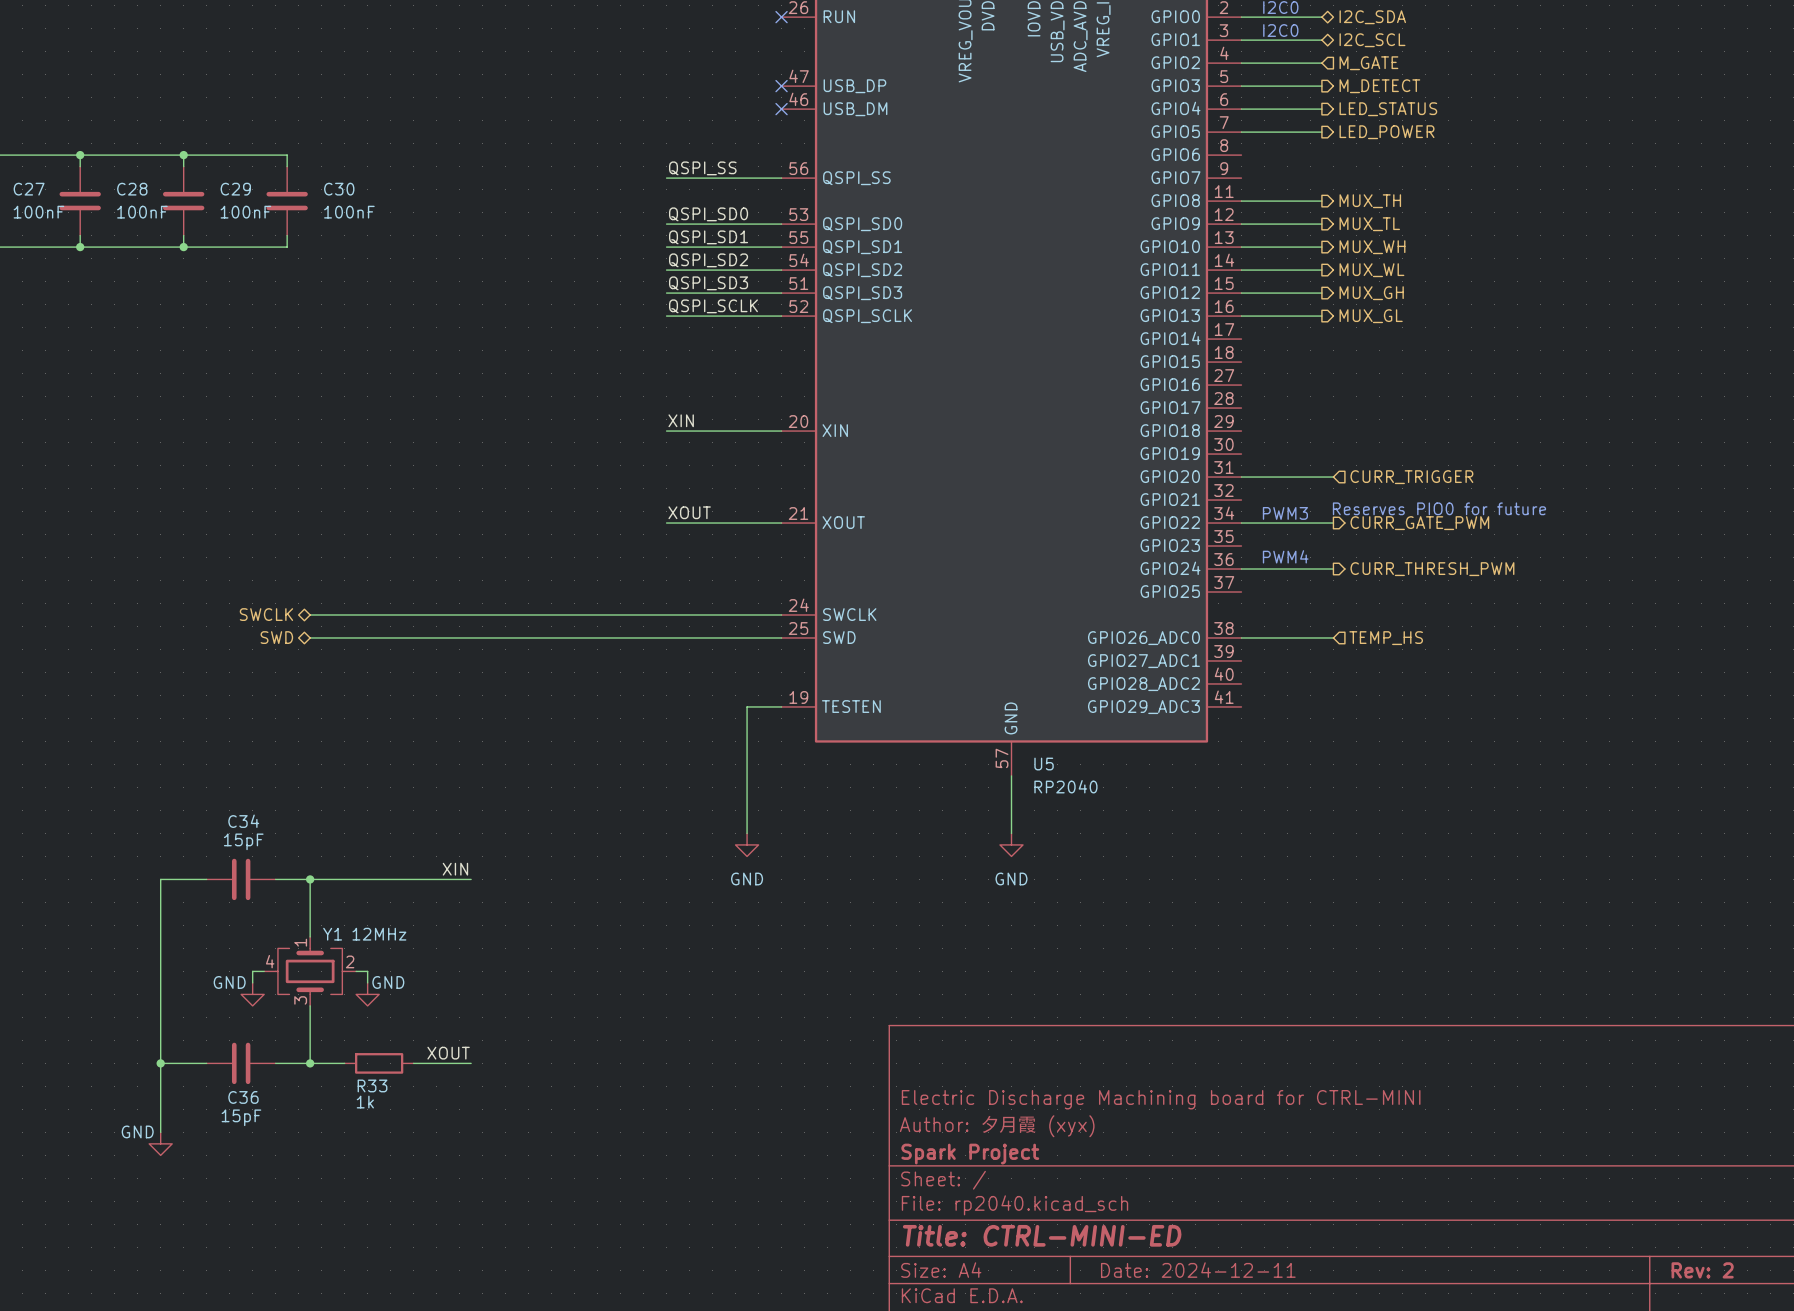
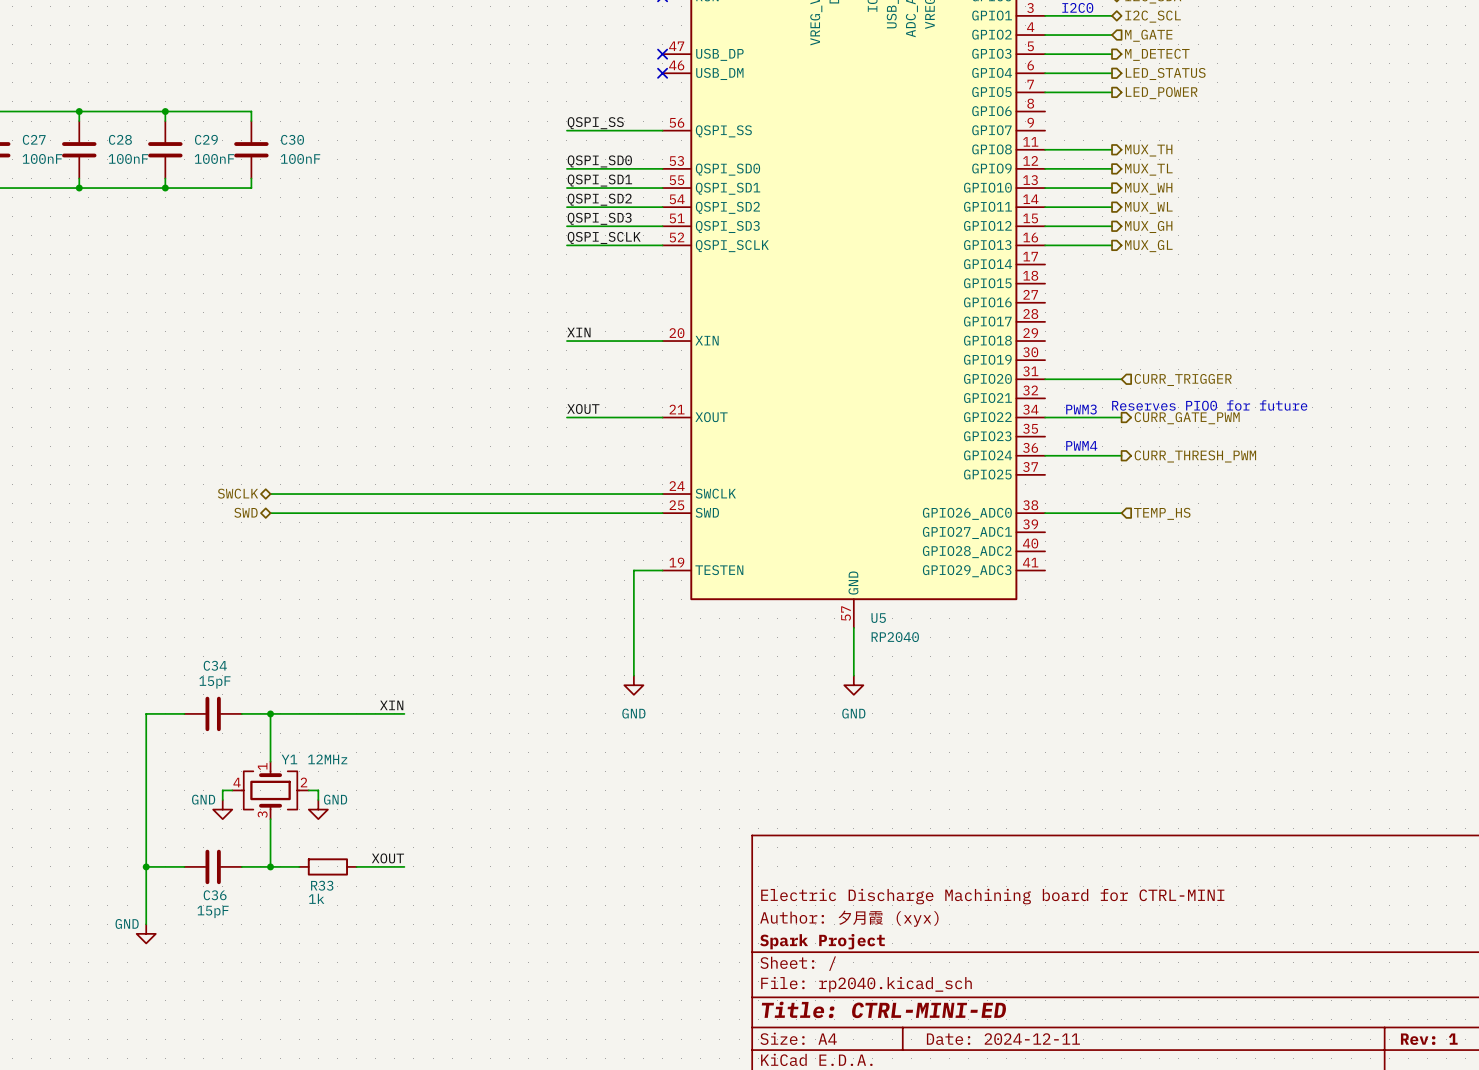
title block: Rev: 2 (1702, 1270) -> Rev: 1 (1429, 1039)

